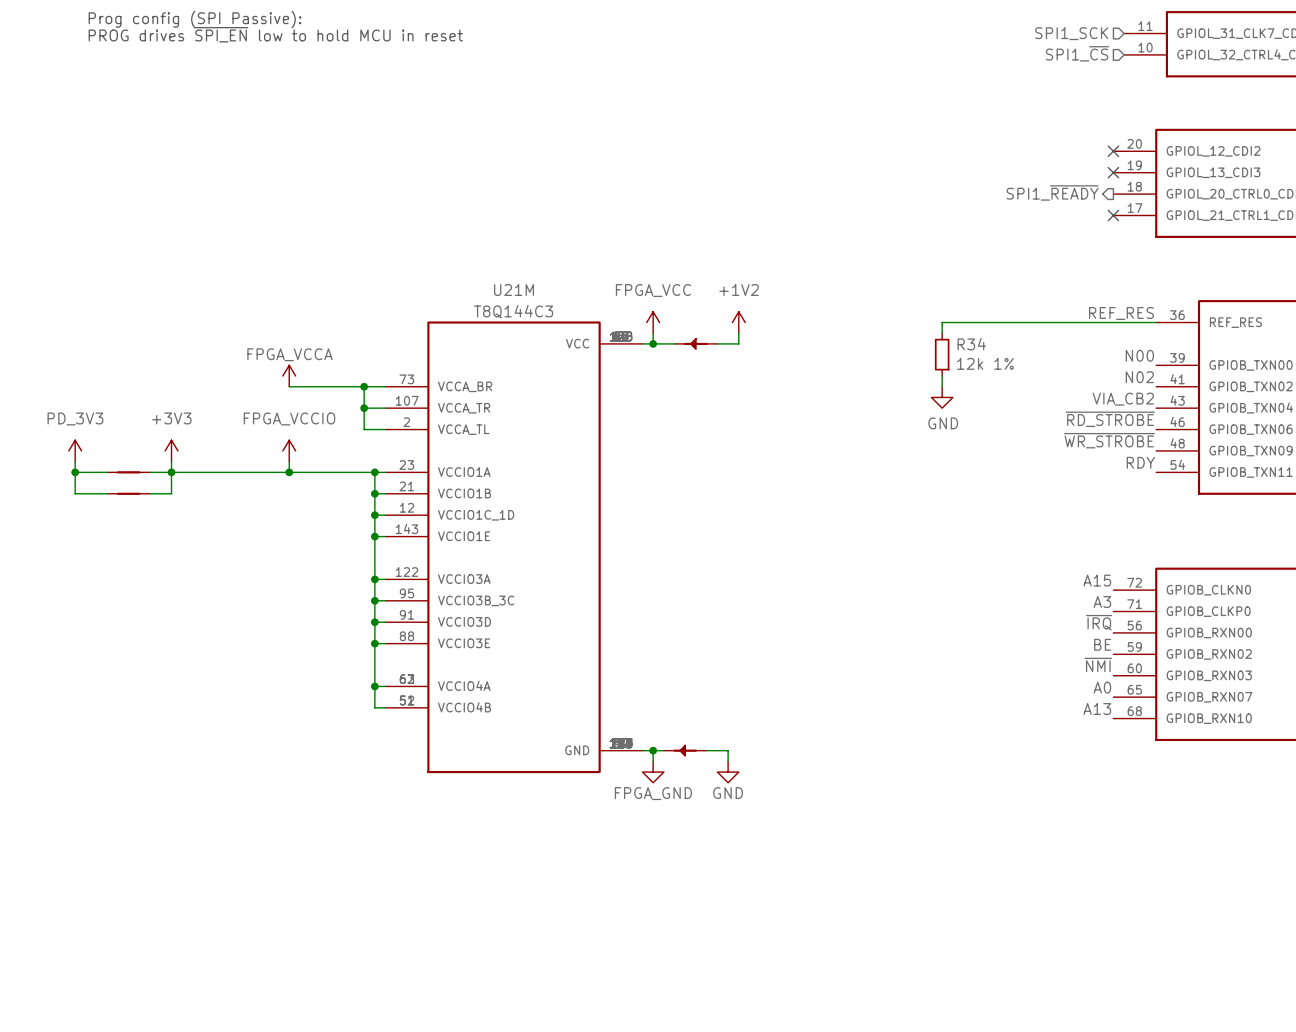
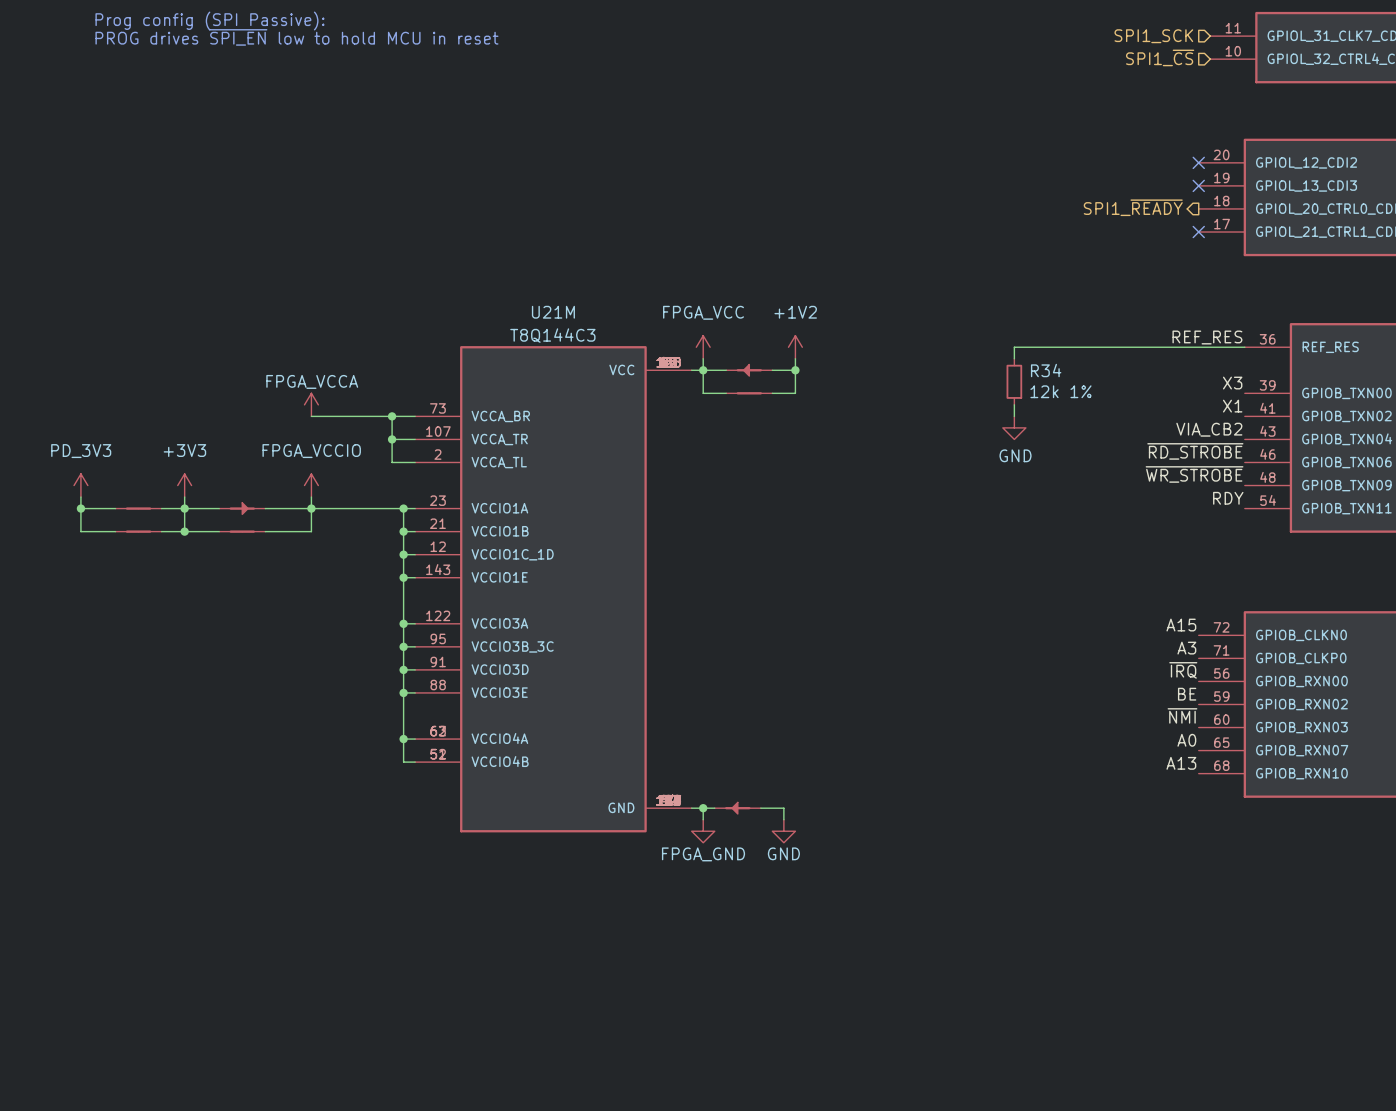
wire: none -> (703, 370) (703, 393) (726, 393)
wire: none -> (795, 370) (795, 393) (772, 393)
junction: none -> (795, 370)
label: N00 (1139, 355) -> X3 (1232, 383)
part: none -> (749, 393)
label: N02 (1139, 377) -> X1 (1232, 406)
part: none -> (242, 508)
wire: none -> (311, 508) (311, 531) (265, 531)
wire: none -> (184, 531) (219, 531)
junction: none -> (184, 531)
part: none -> (242, 531)

